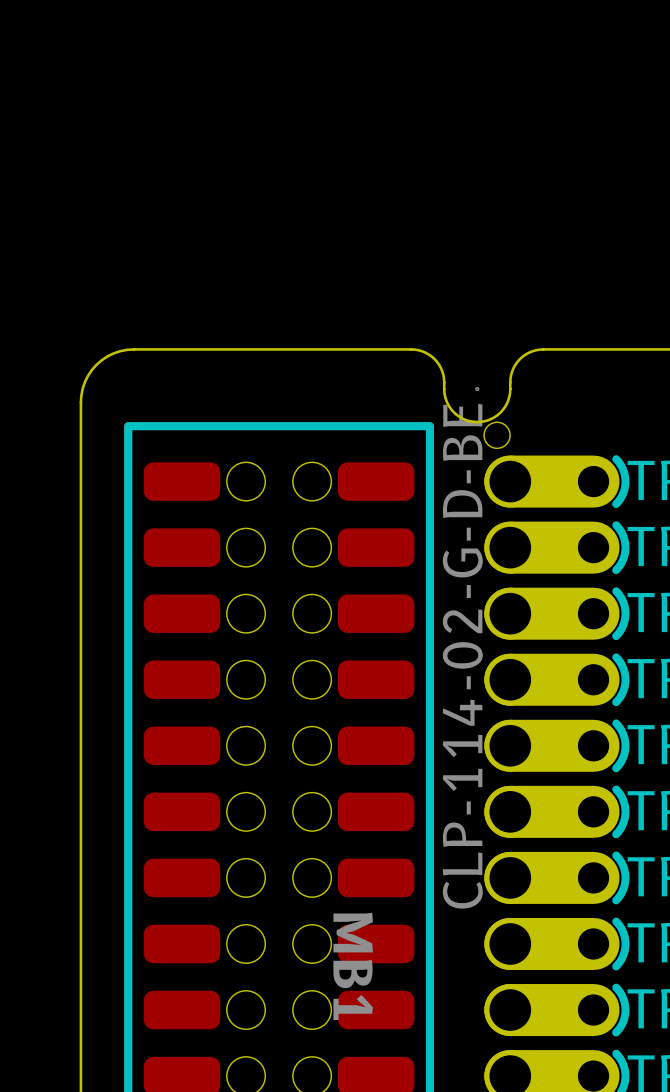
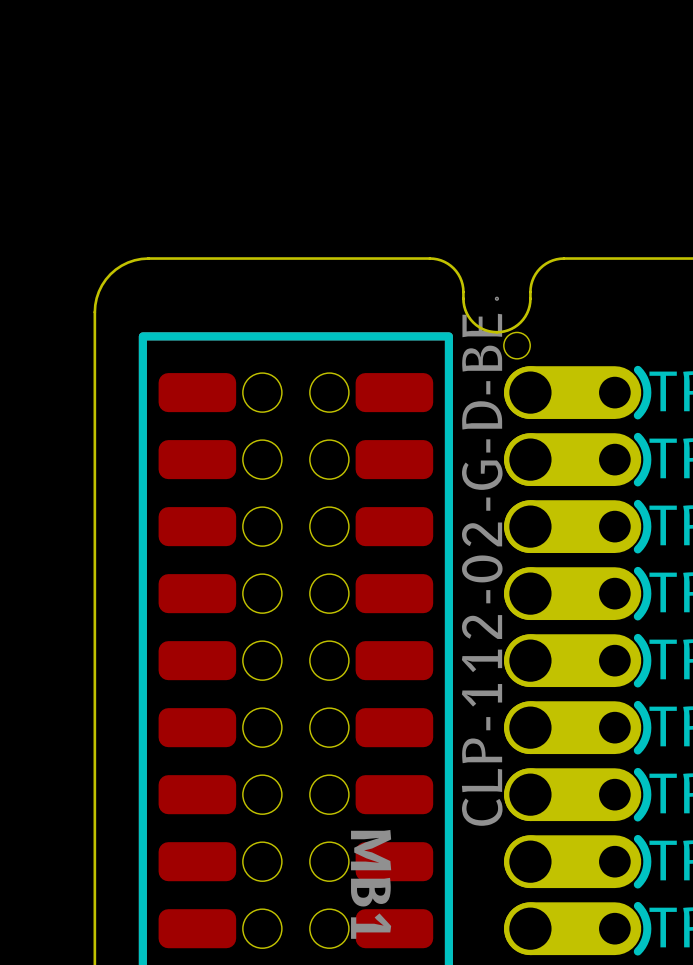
part value: CLP-114-02-G-D-BE (462, 656) -> CLP-112-02-G-D-BE (482, 569)

